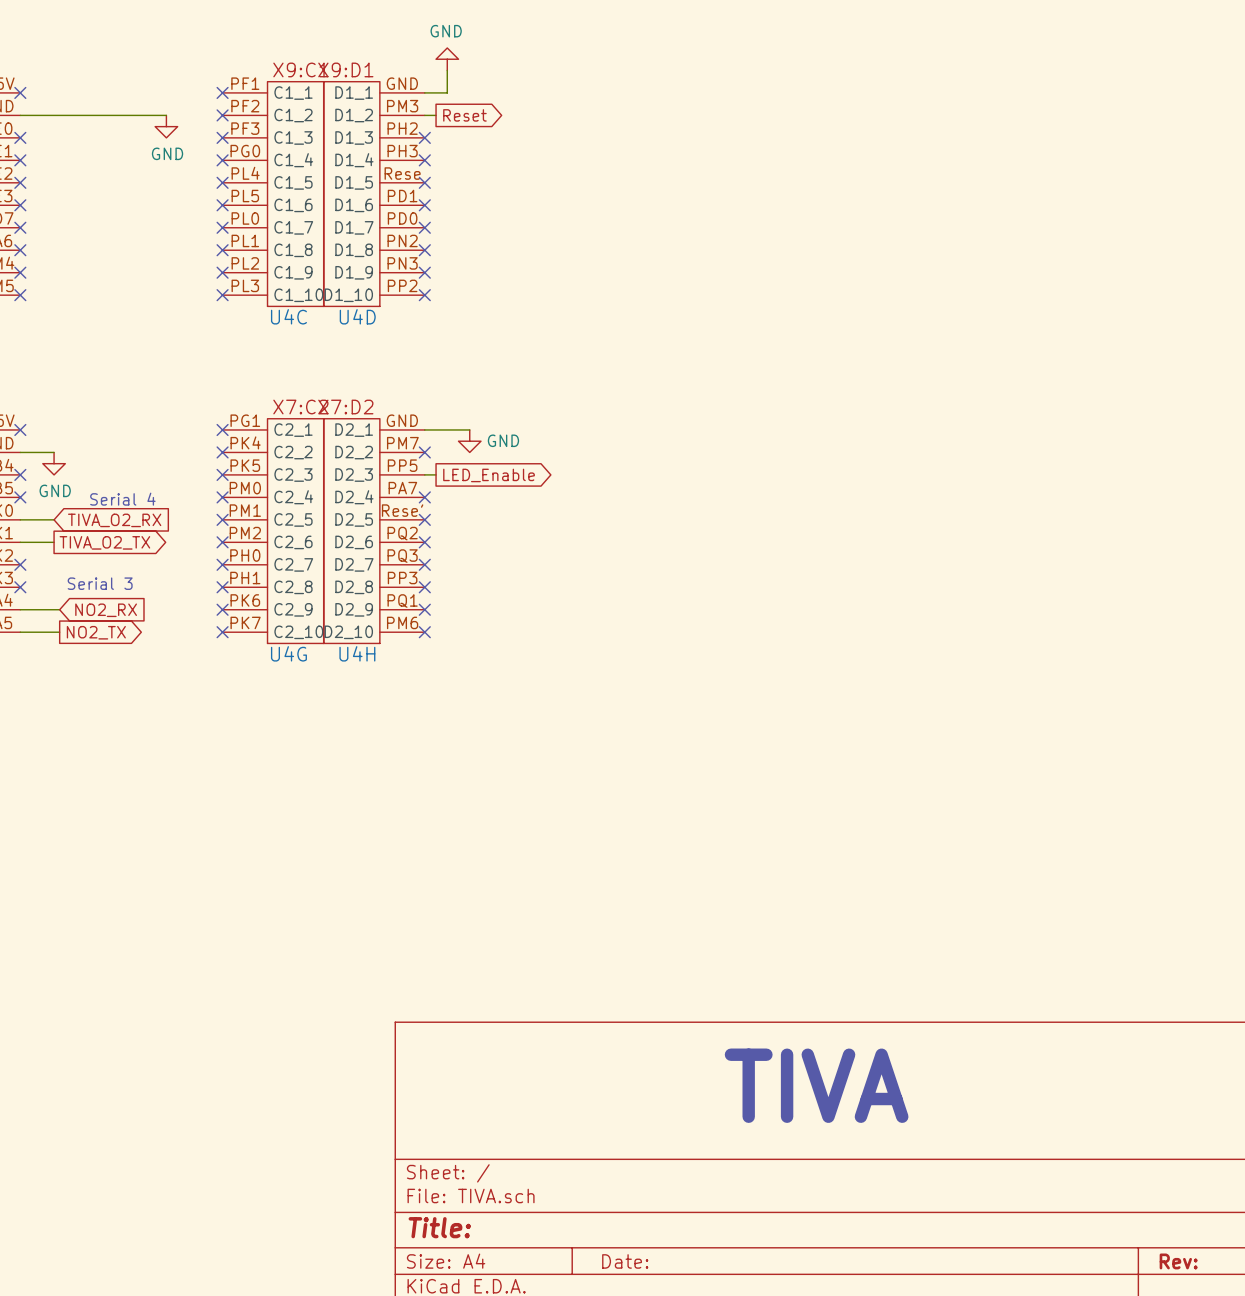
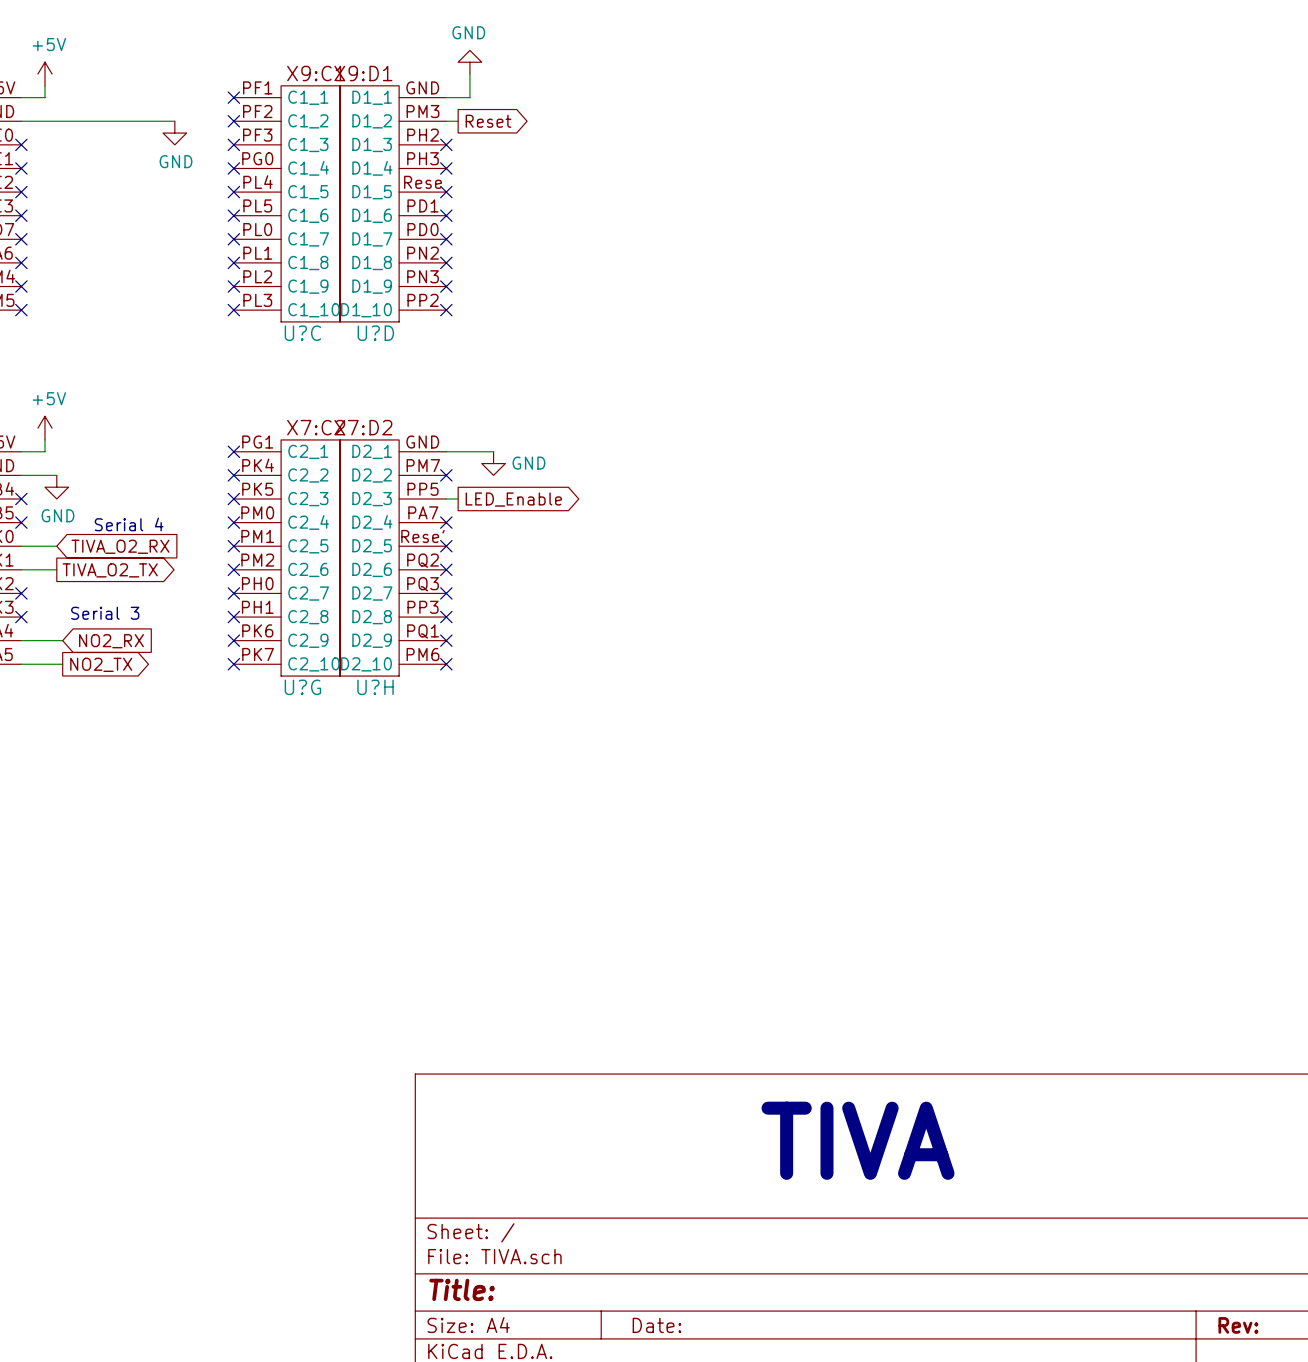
power symbol: none -> +5V (44, 74)
wire: none -> (44, 85) (44, 97) (21, 97)
no-connect mark: (20, 92) -> none
U4C name: U4C (288, 316) -> U?C (302, 333)
U4D name: U4D (357, 316) -> U?D (375, 333)
power symbol: none -> +5V (44, 428)
wire: none -> (44, 439) (44, 451) (21, 451)
no-connect mark: (20, 429) -> none
U4G name: U4G (288, 653) -> U?G (302, 687)
U4H name: U4H (357, 653) -> U?H (375, 687)

